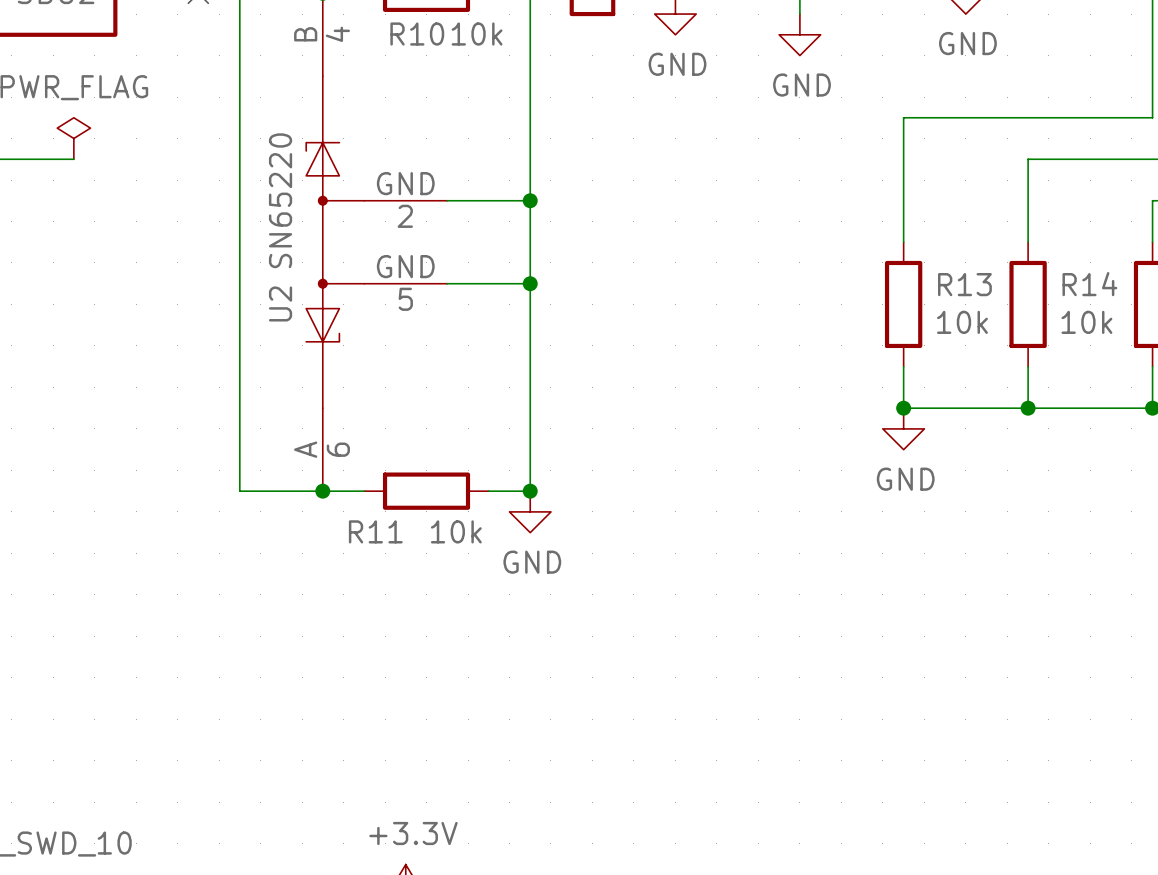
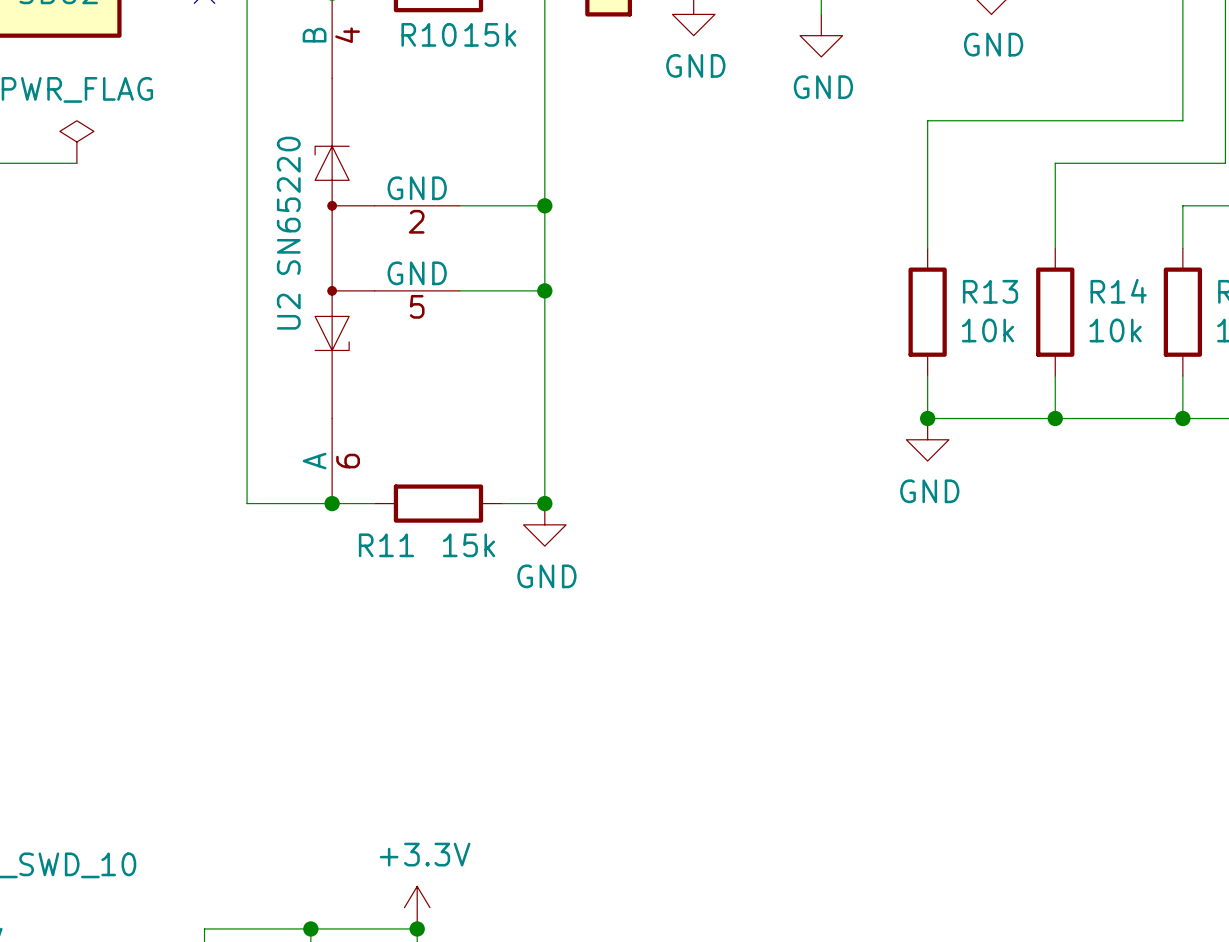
R10 value: 10k (477, 34) -> 15k (490, 34)
R11 value: 10k (456, 531) -> 15k (469, 545)

